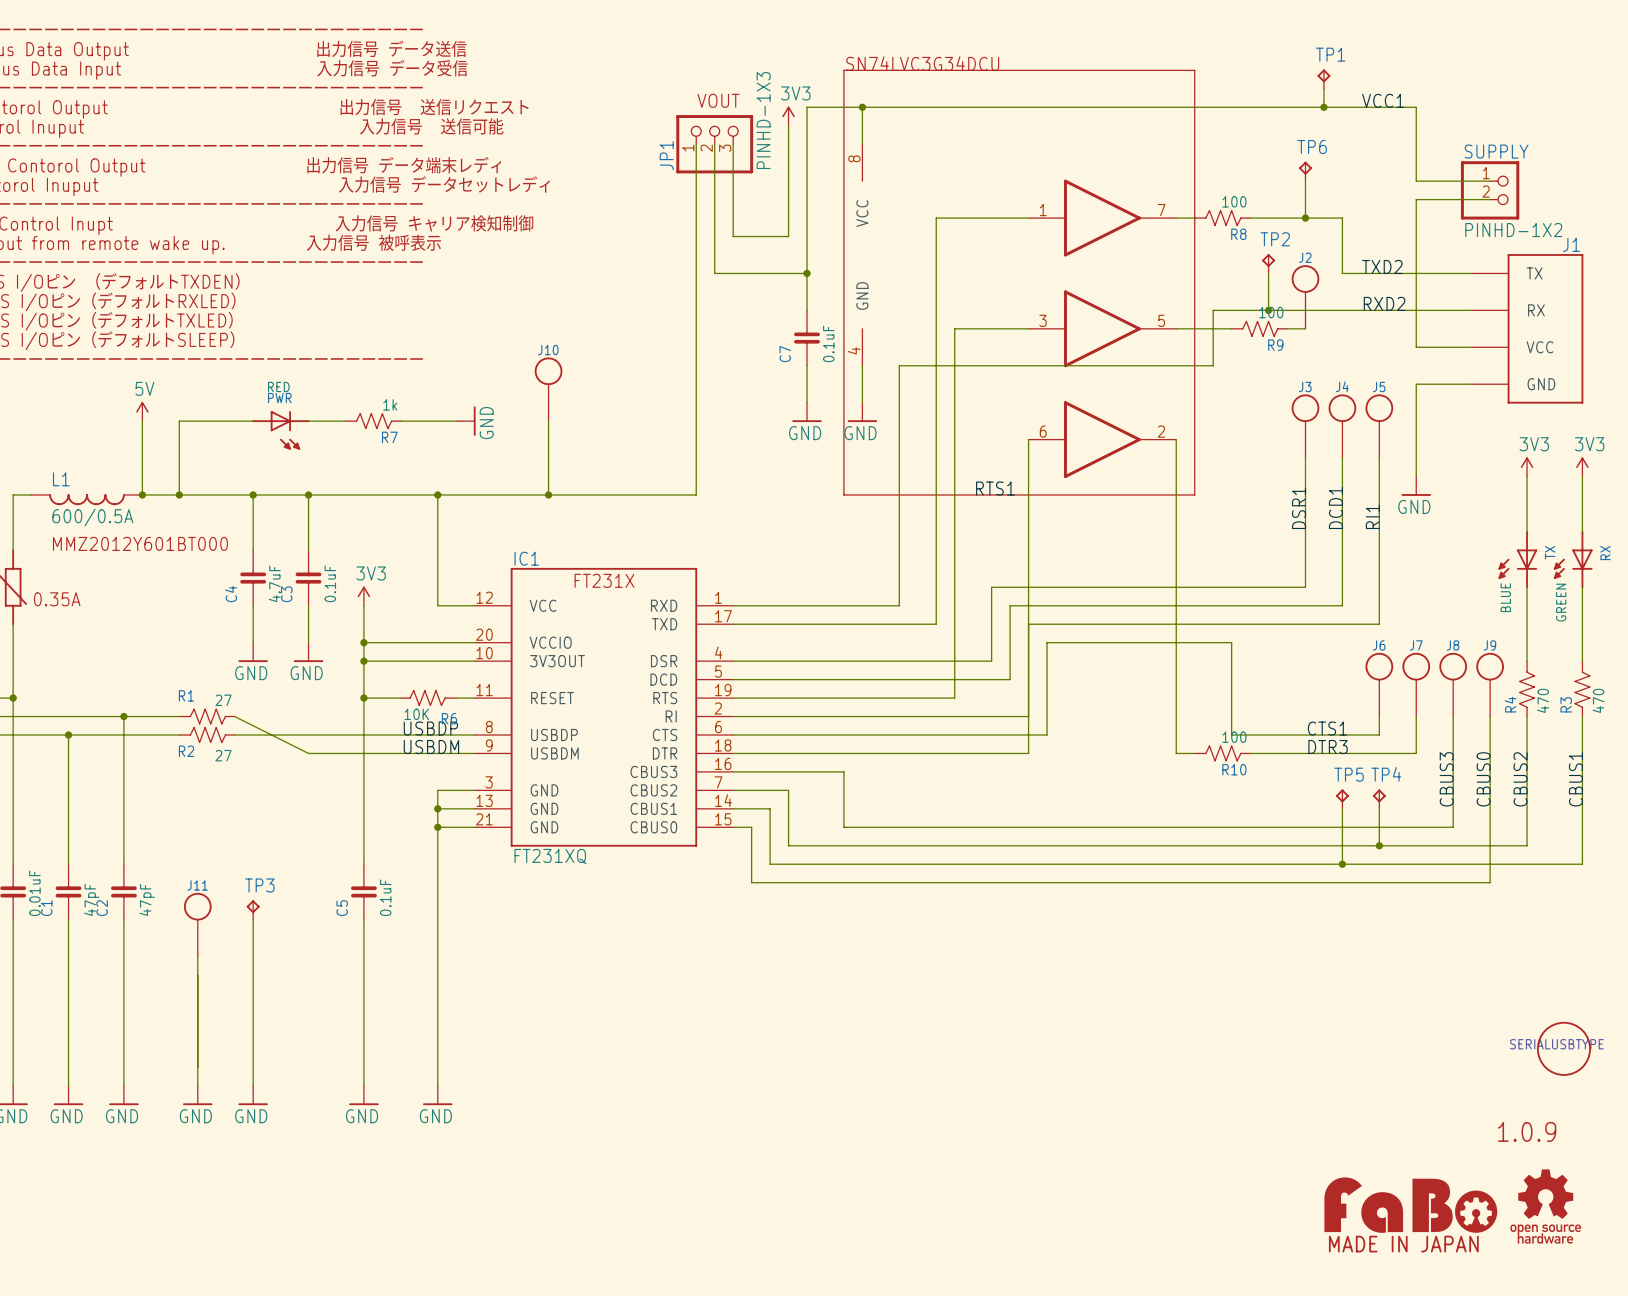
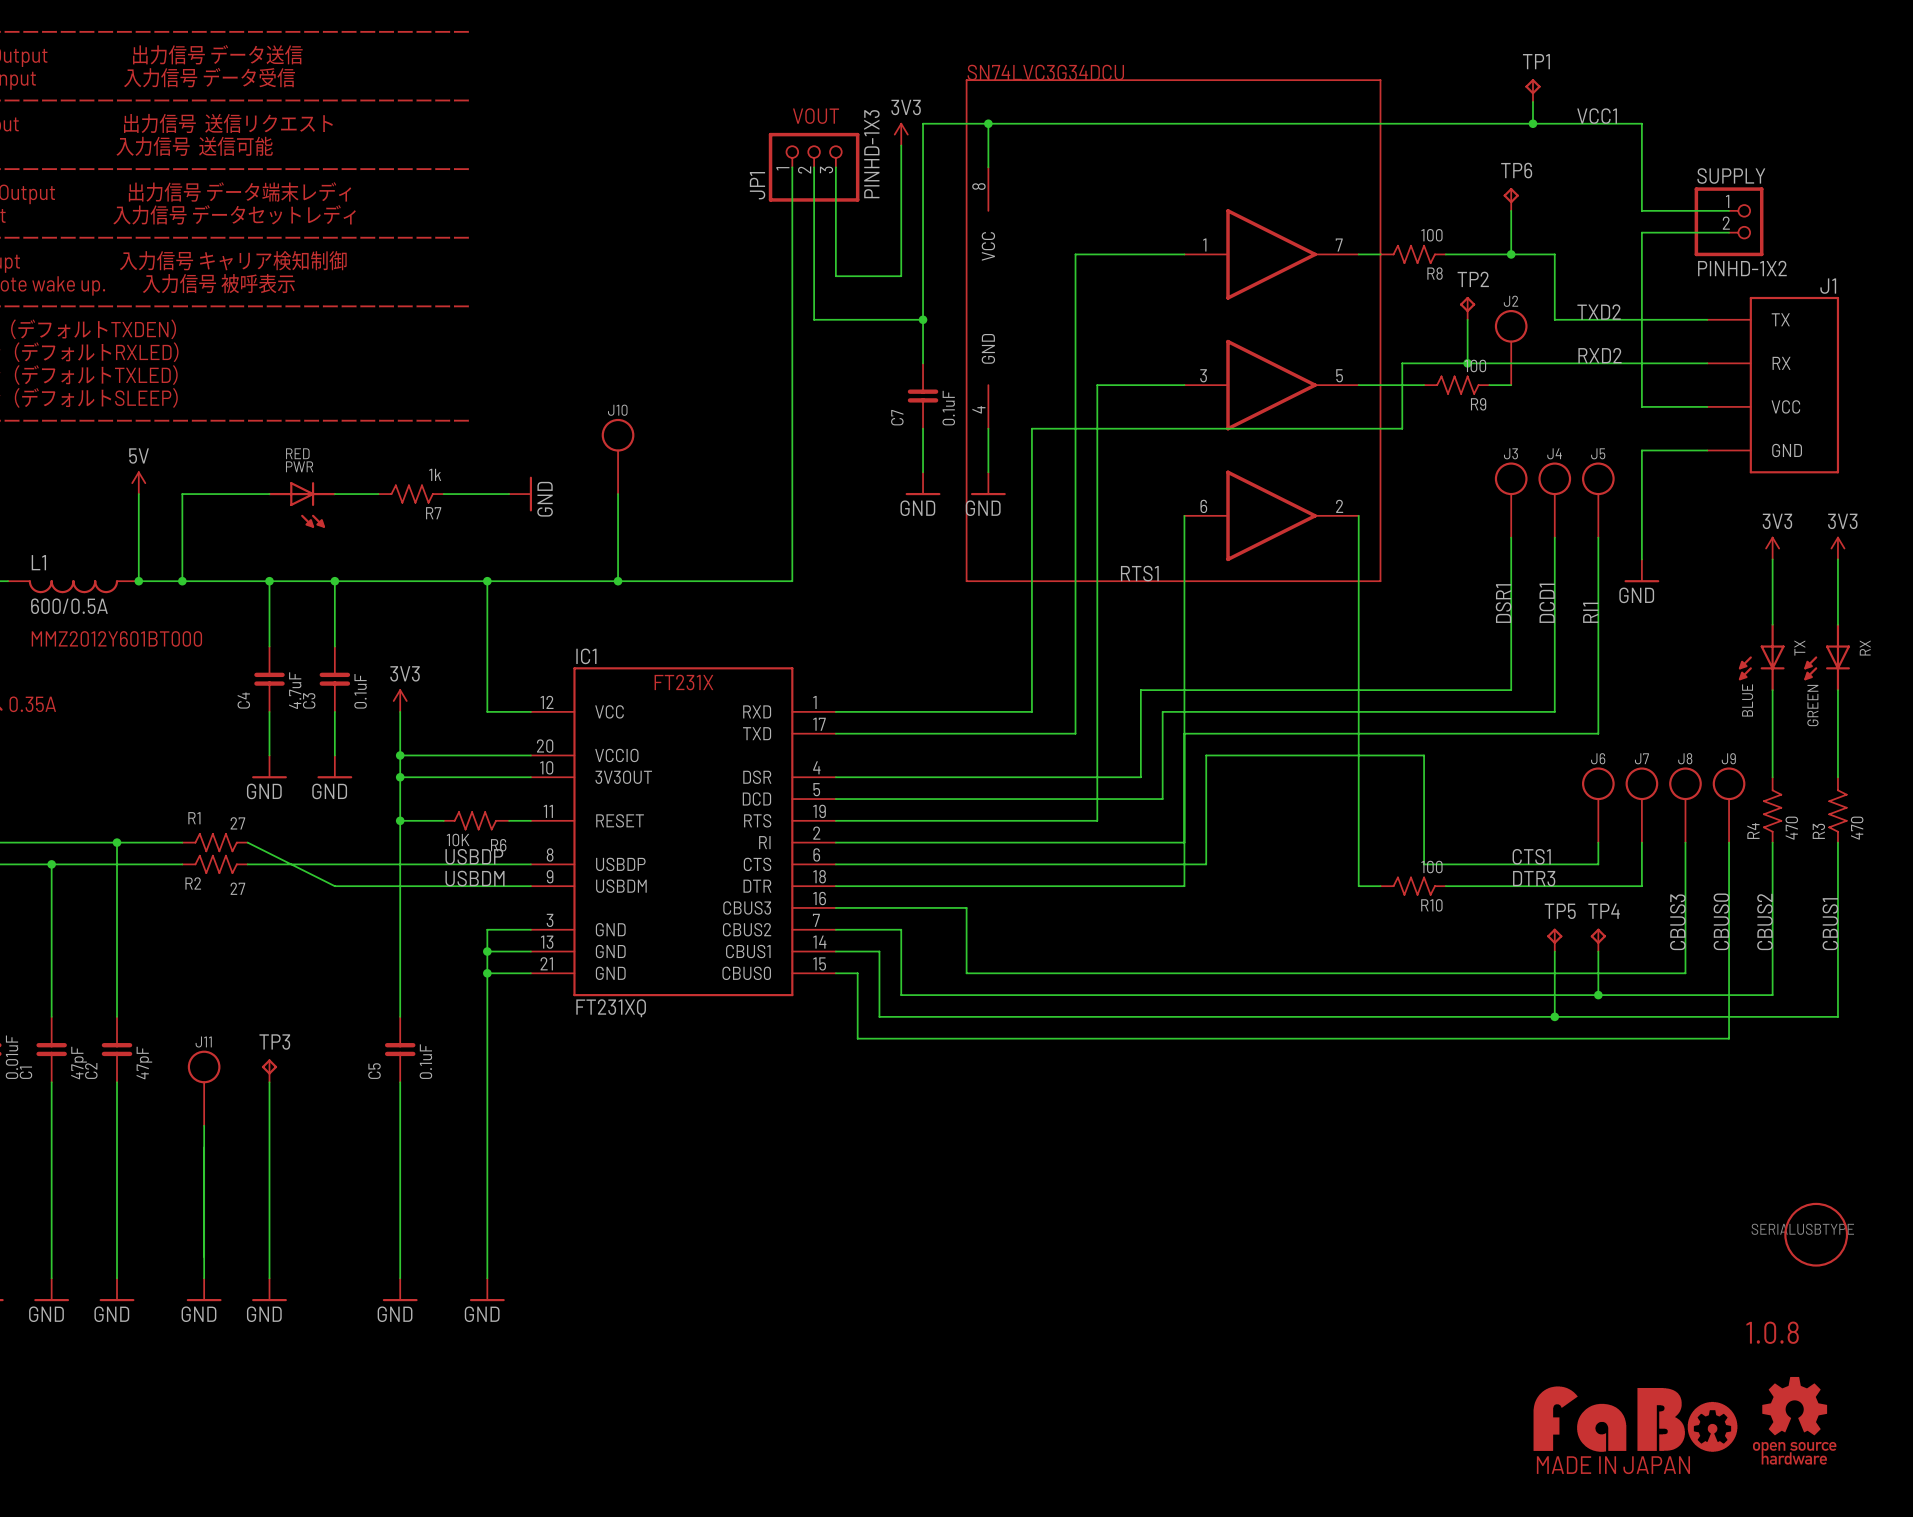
text: 1.0.9 (1527, 1131) -> 1.0.8 (1772, 1332)

